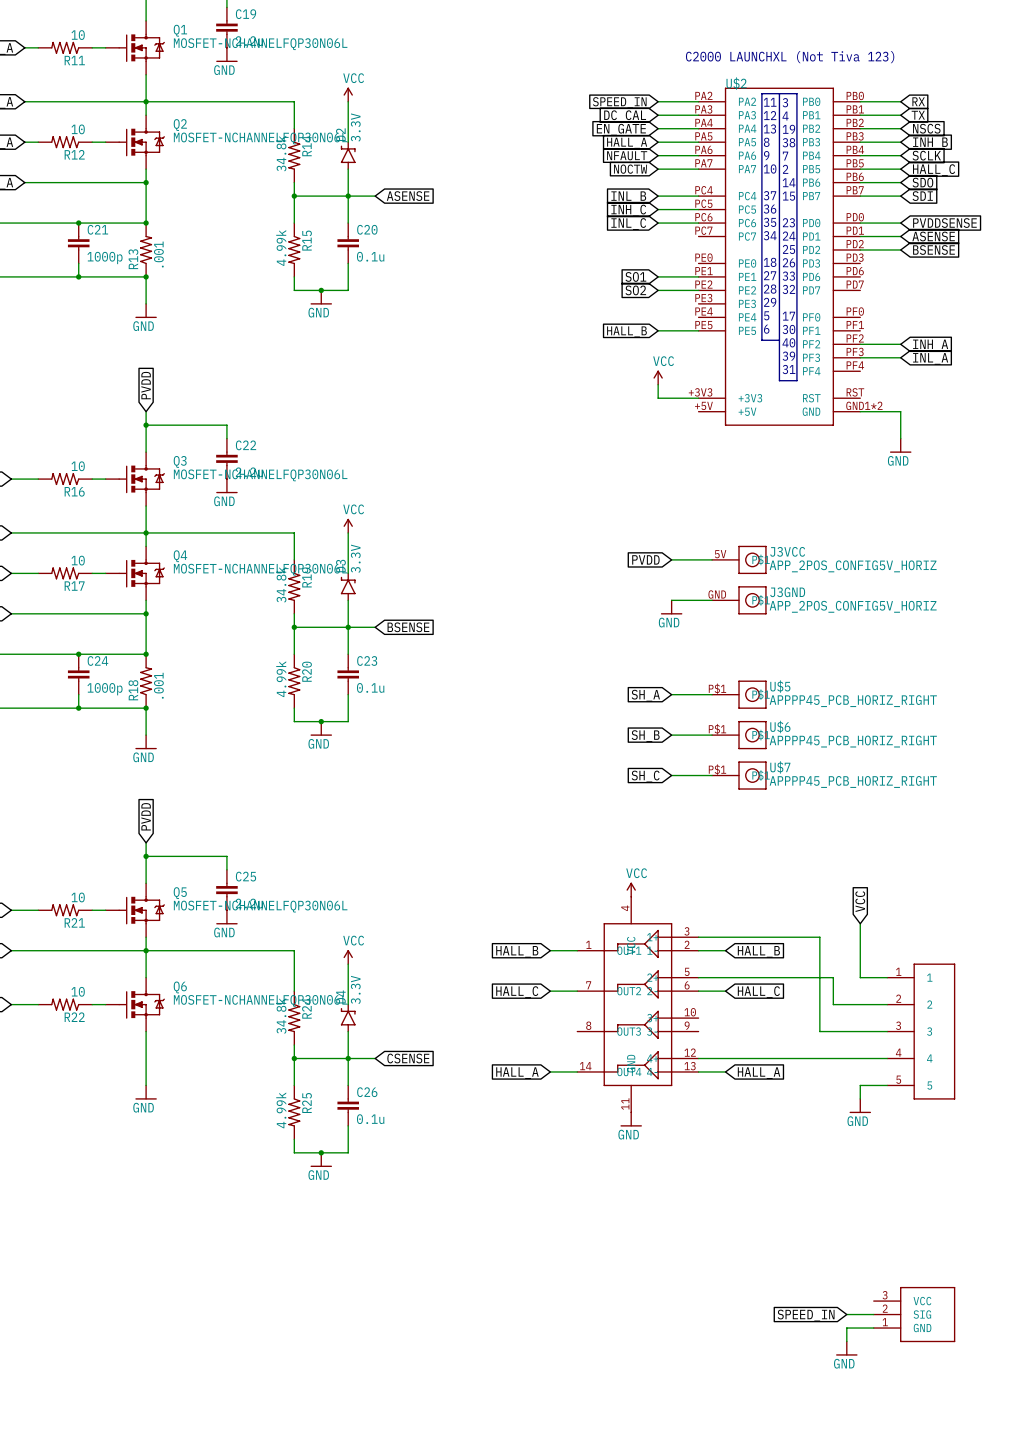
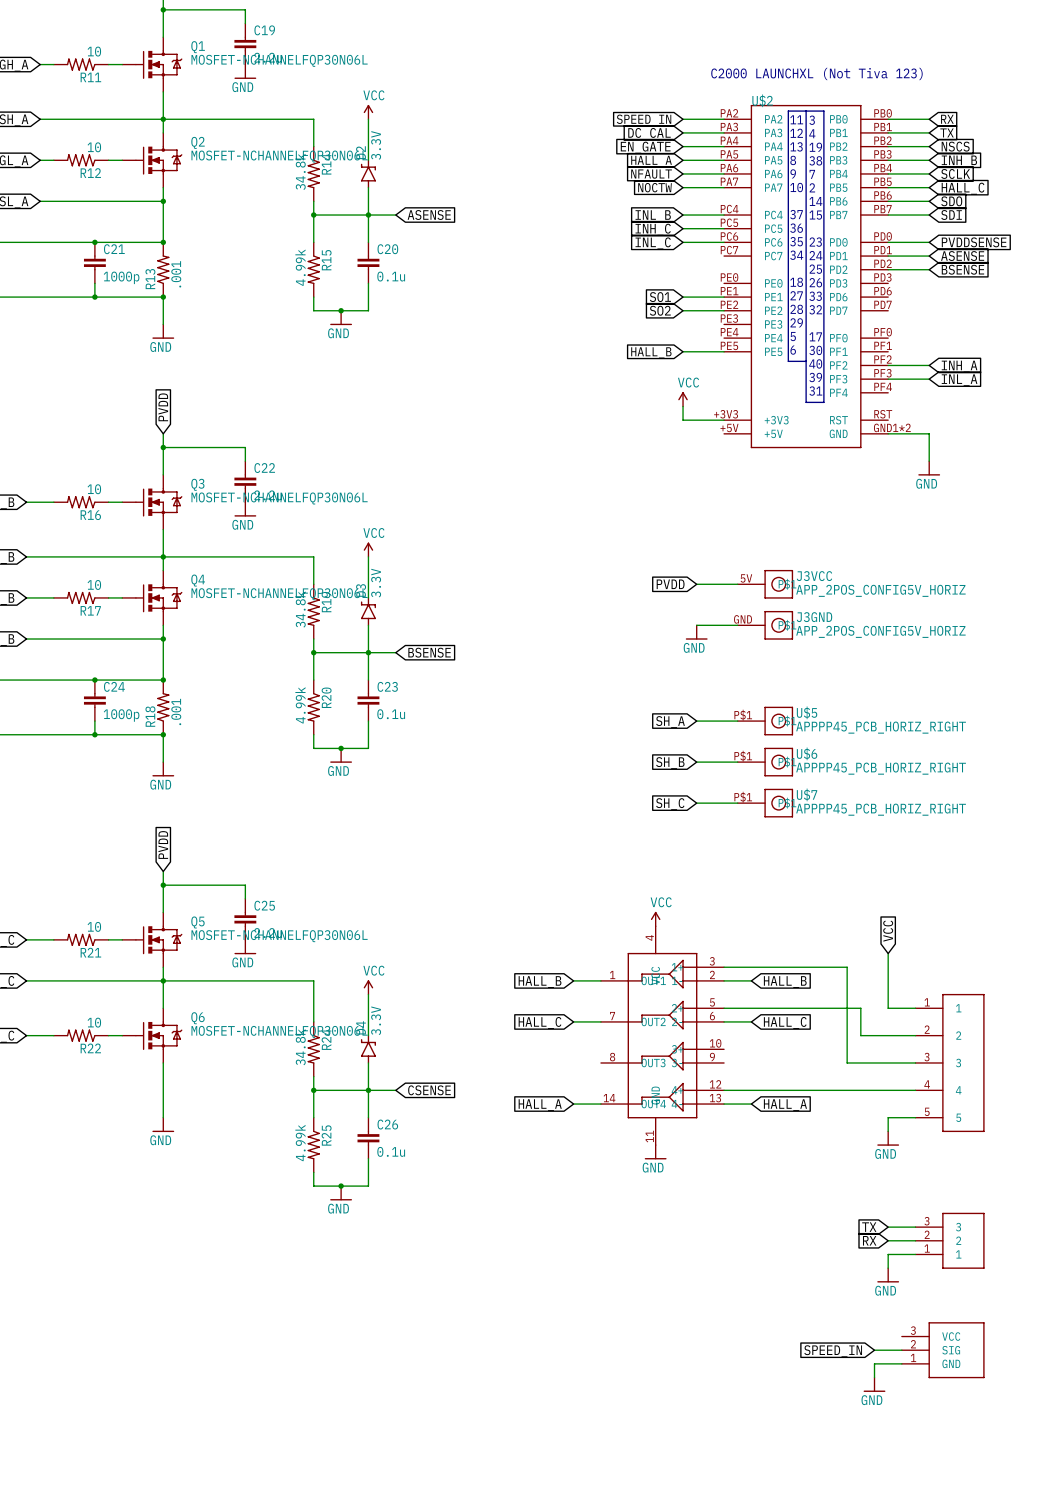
global label: none -> TX (869, 1227)
wire: none -> (888, 1227) (915, 1227)
global label: none -> RX (869, 1240)
wire: none -> (888, 1240) (915, 1240)
part: none -> (950, 1240)
wire: none -> (915, 1254) (888, 1254) (888, 1268)
power symbol: none -> GND (888, 1275)

